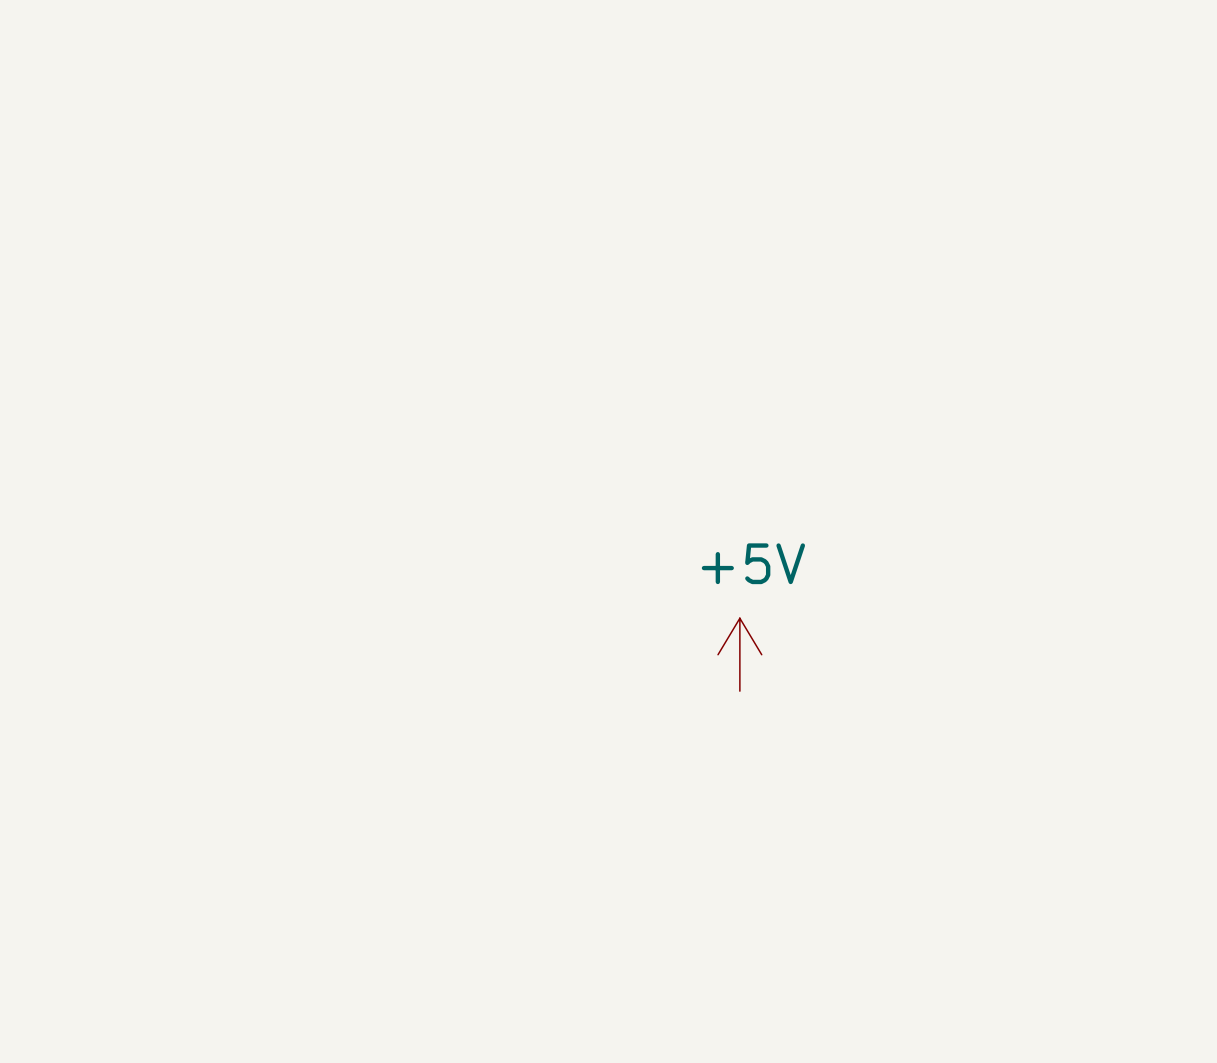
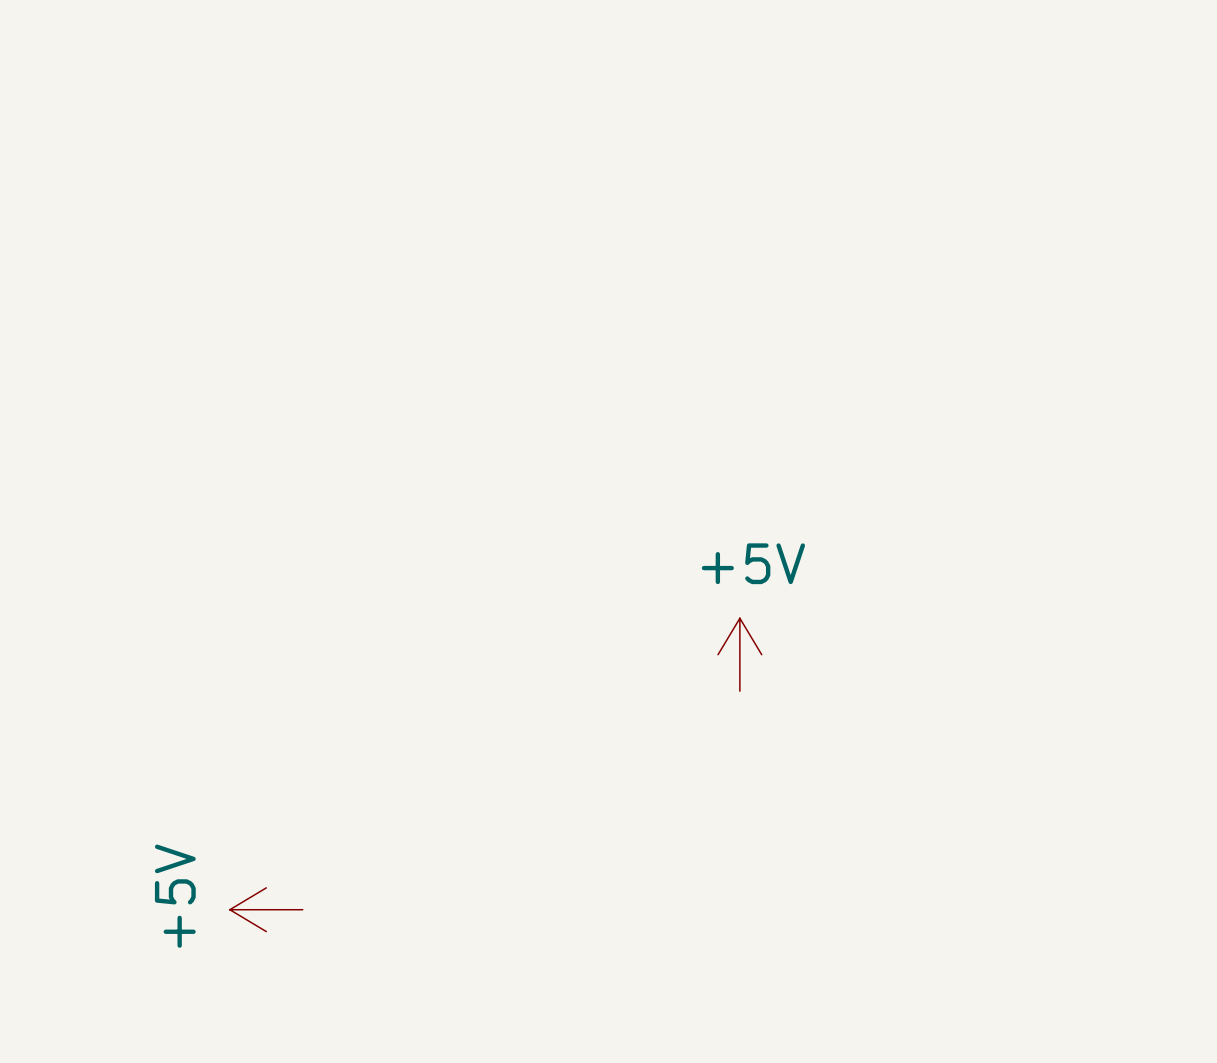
power symbol: none -> +5V (266, 909)

